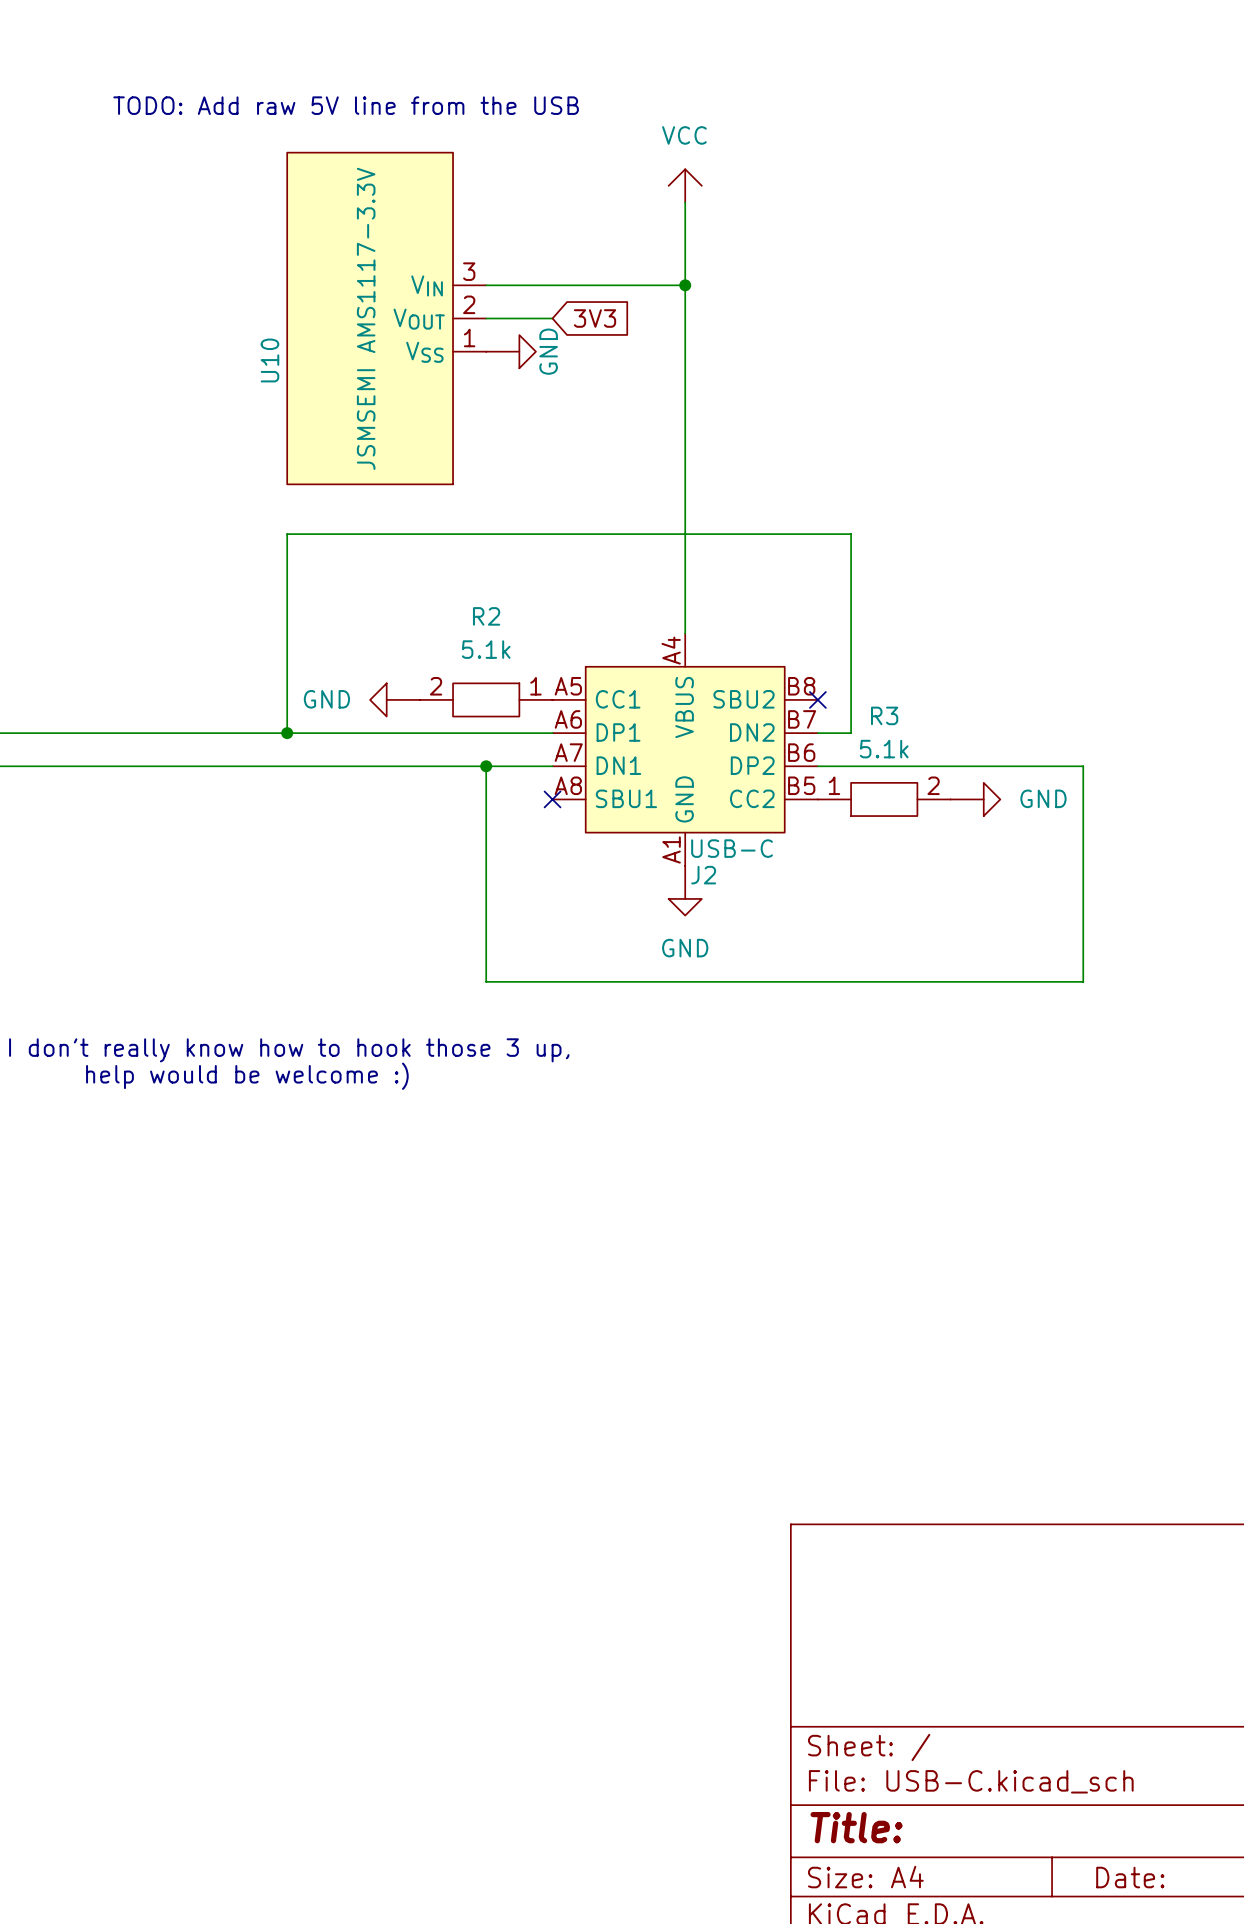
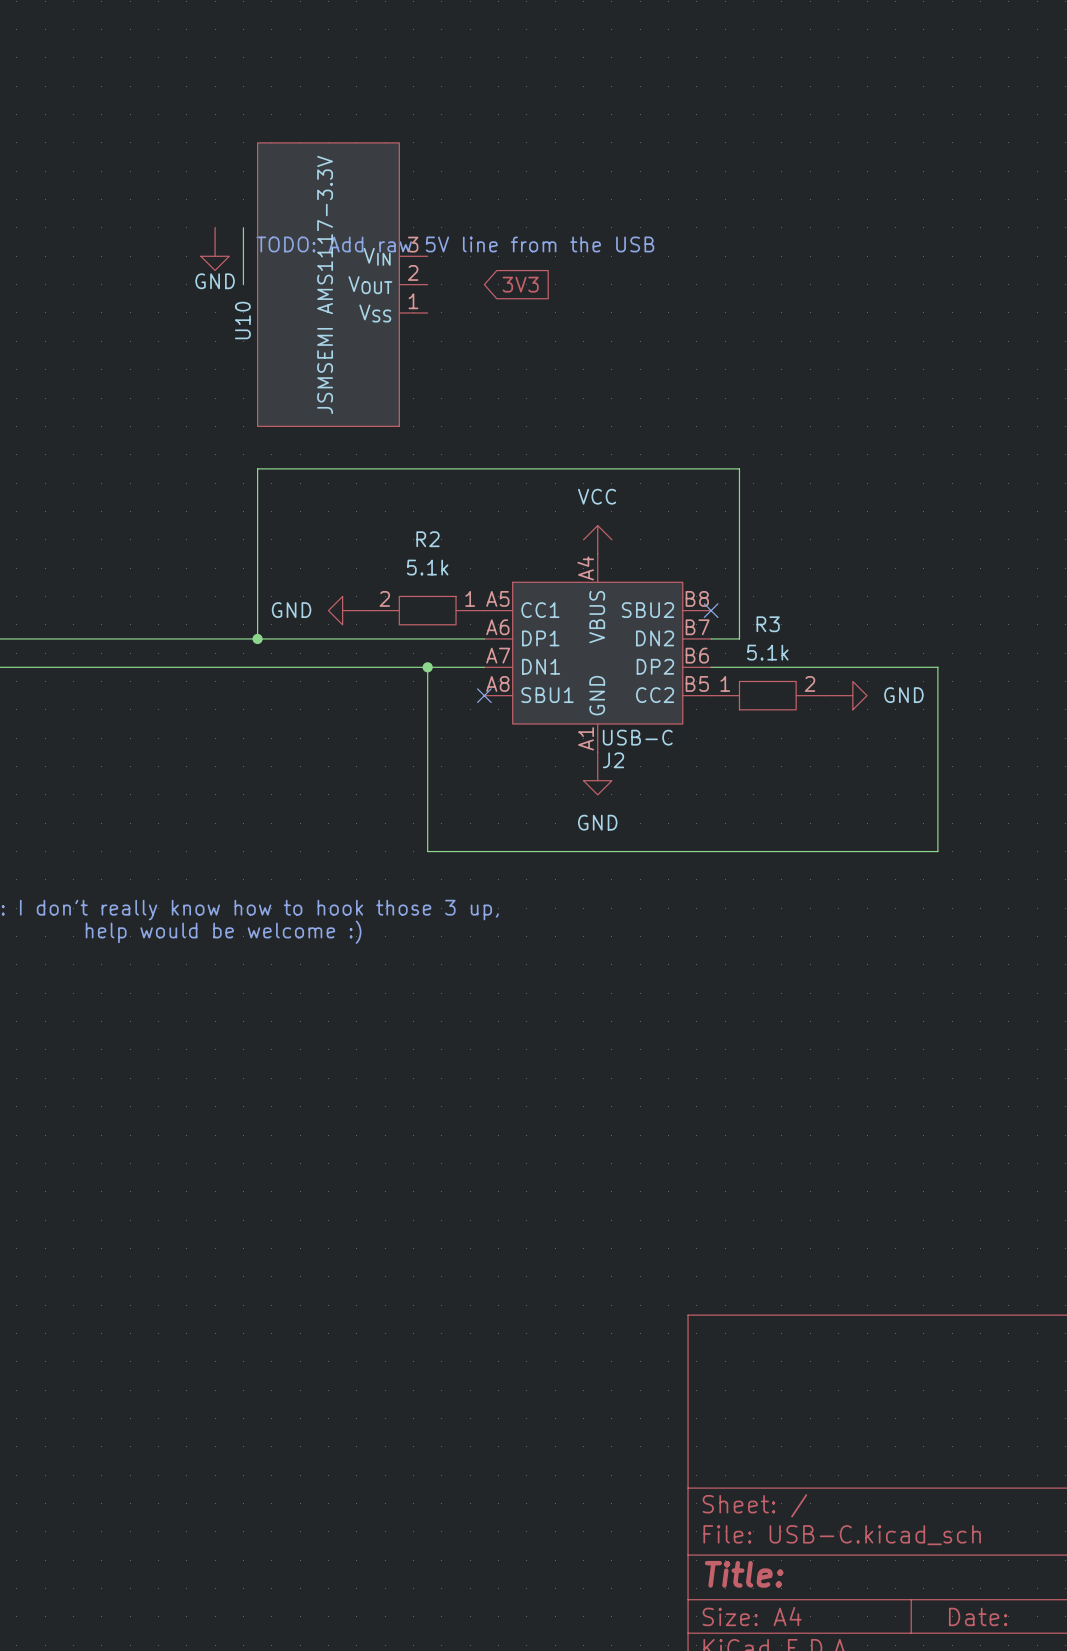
text position: TODO: Add raw 5V line from the USB (346, 105) -> TODO: Add raw 5V line from the USB (455, 244)
power symbol: VCC (685, 185) -> none
wire: (685, 202) (685, 633) -> none
wire: none -> (243, 227) (243, 284)
wire: (486, 285) (685, 285) -> none
junction: (685, 285) -> none
wire: (486, 318) (552, 318) -> none
power symbol position: GND (511, 351) -> GND (215, 249)
power symbol rotation: 0° (527, 351) -> 90° clockwise (215, 263)
power symbol: none -> VCC (597, 539)

